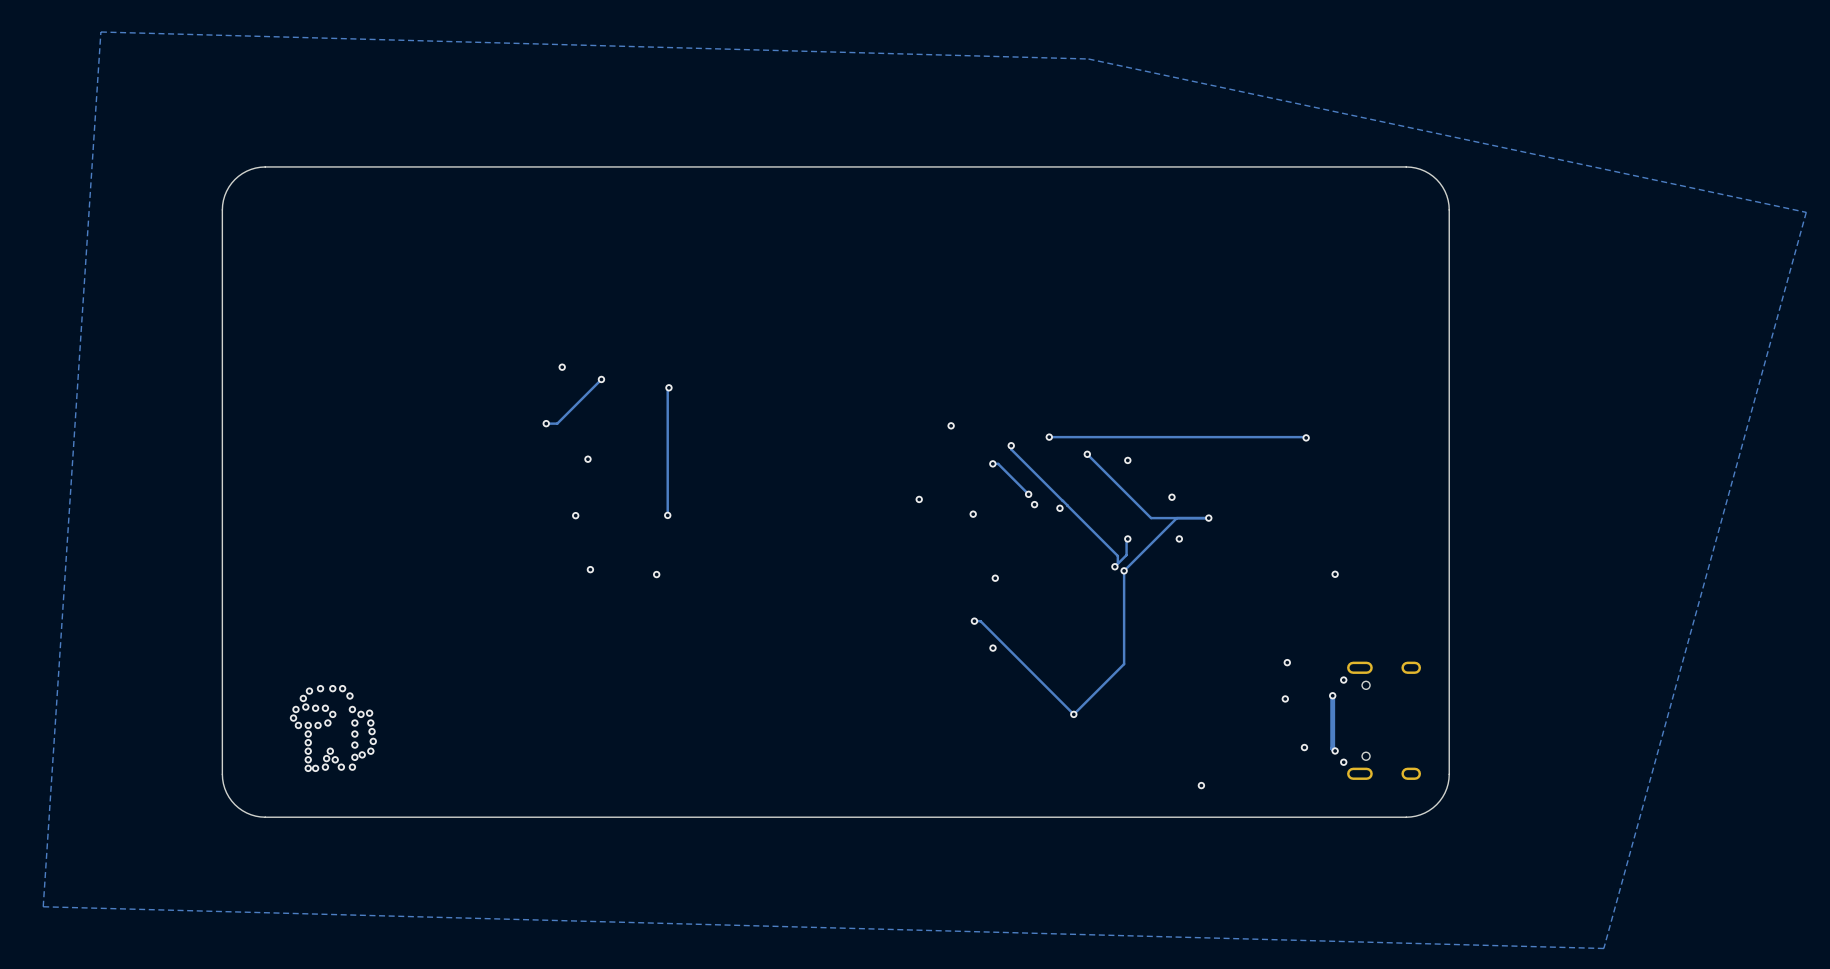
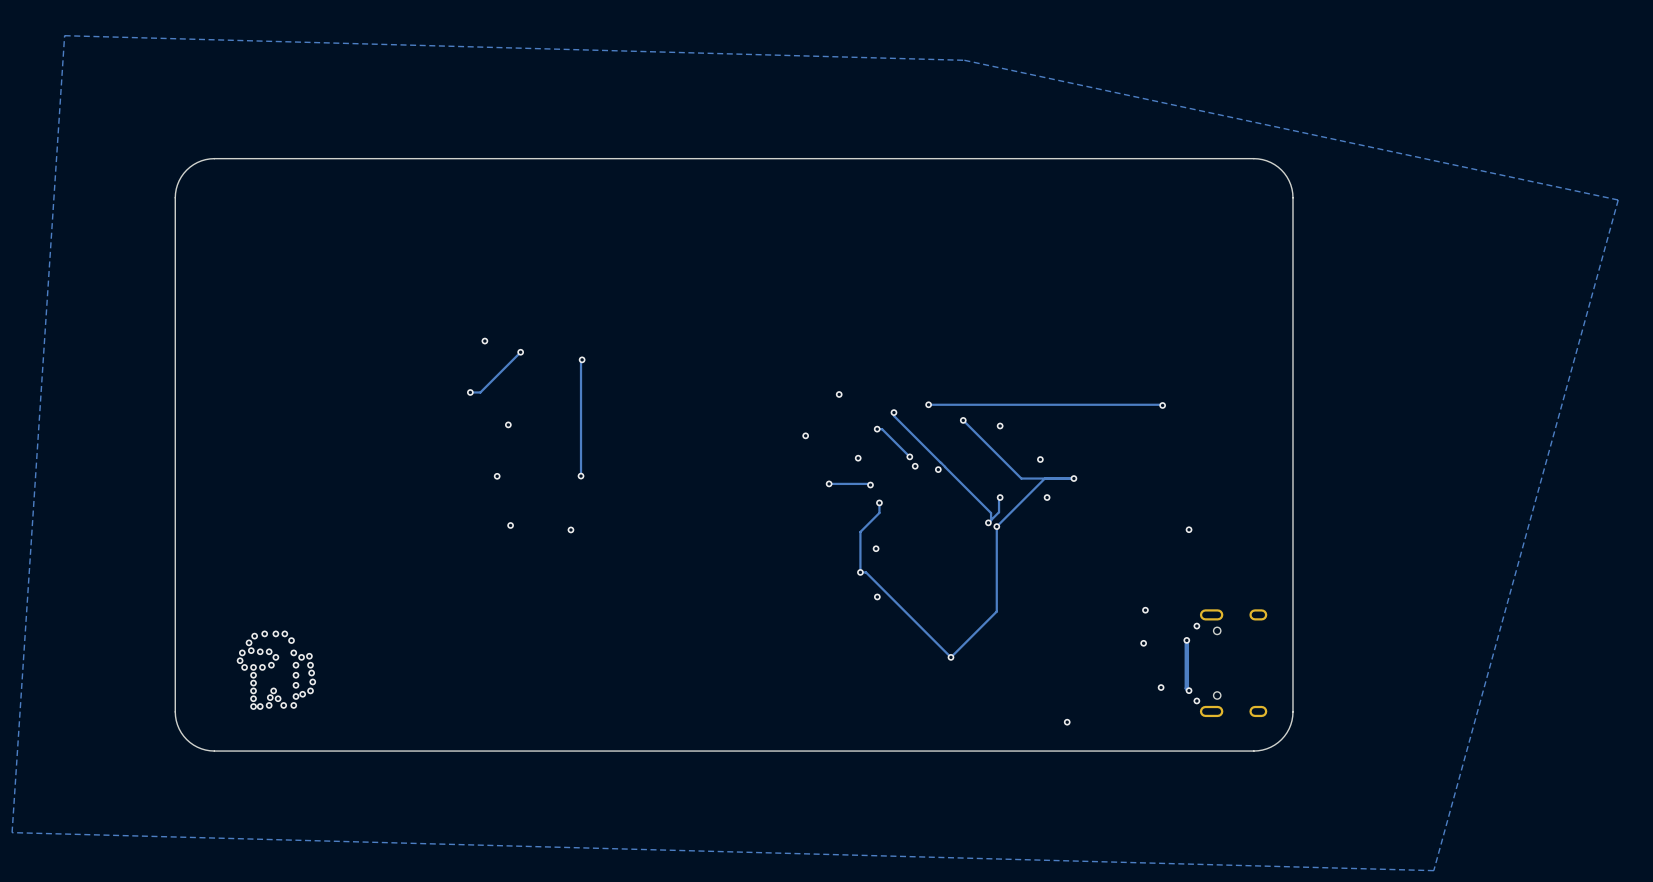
via: none -> (805, 435)
via: none -> (858, 458)
via: (919, 499) -> none
via: (973, 514) -> none
track: none -> (829, 483) (870, 485)
via: none -> (829, 483)
via: none -> (870, 485)
track: none -> (879, 502) (879, 512) (860, 531) (860, 572)
via: none -> (879, 502)
via: (995, 578) -> none
via: none -> (876, 548)

